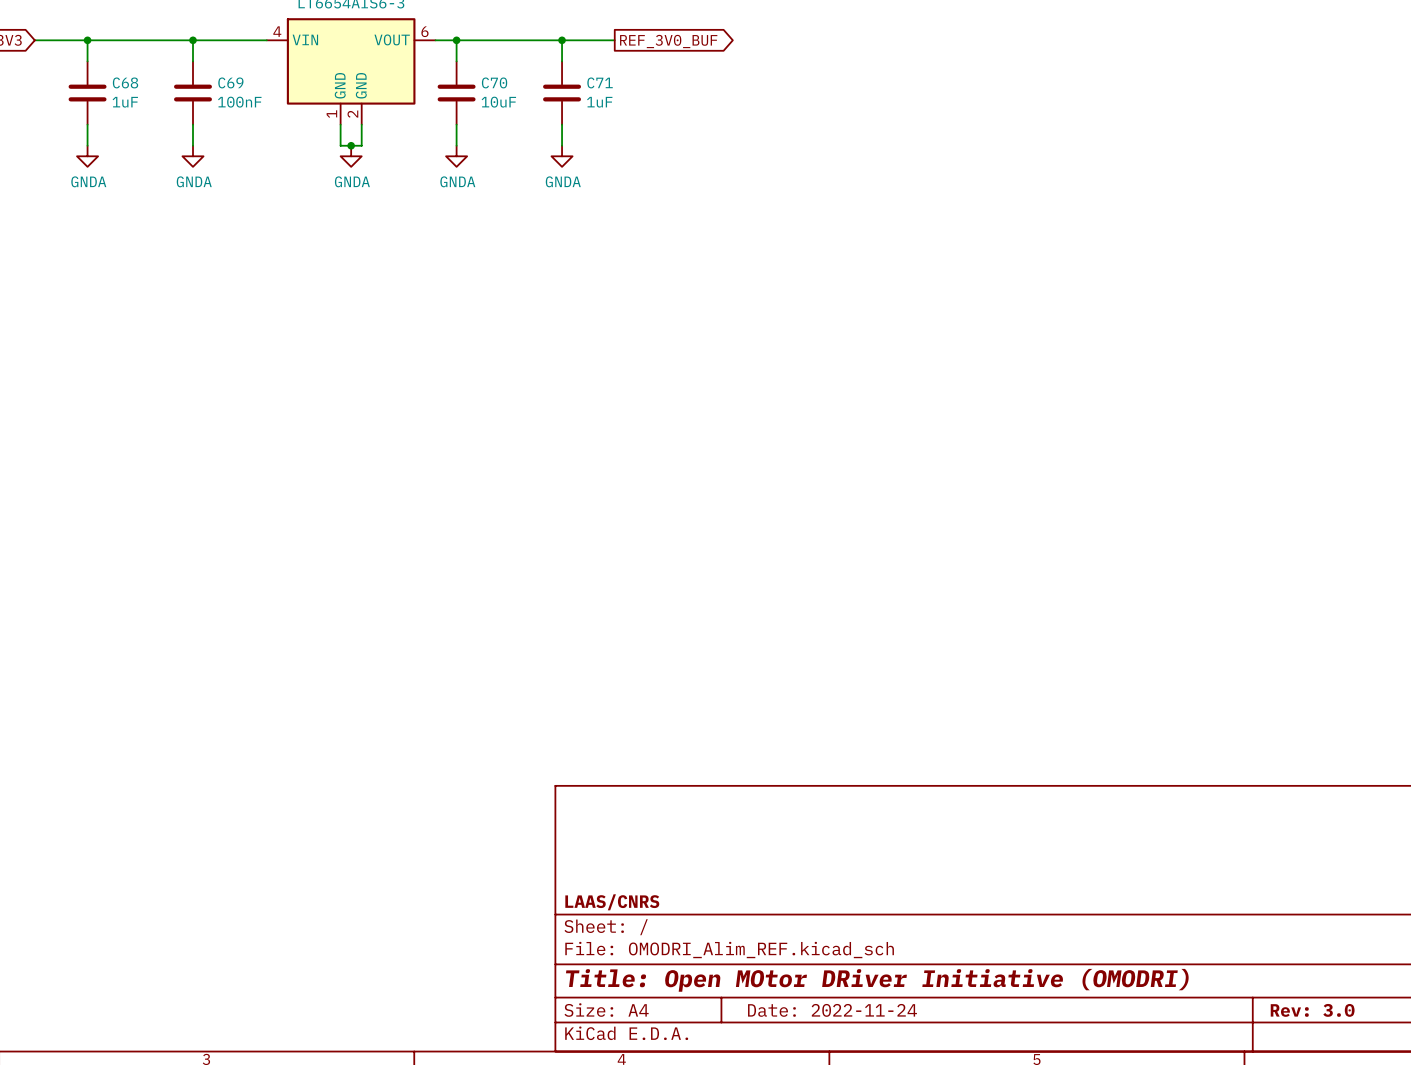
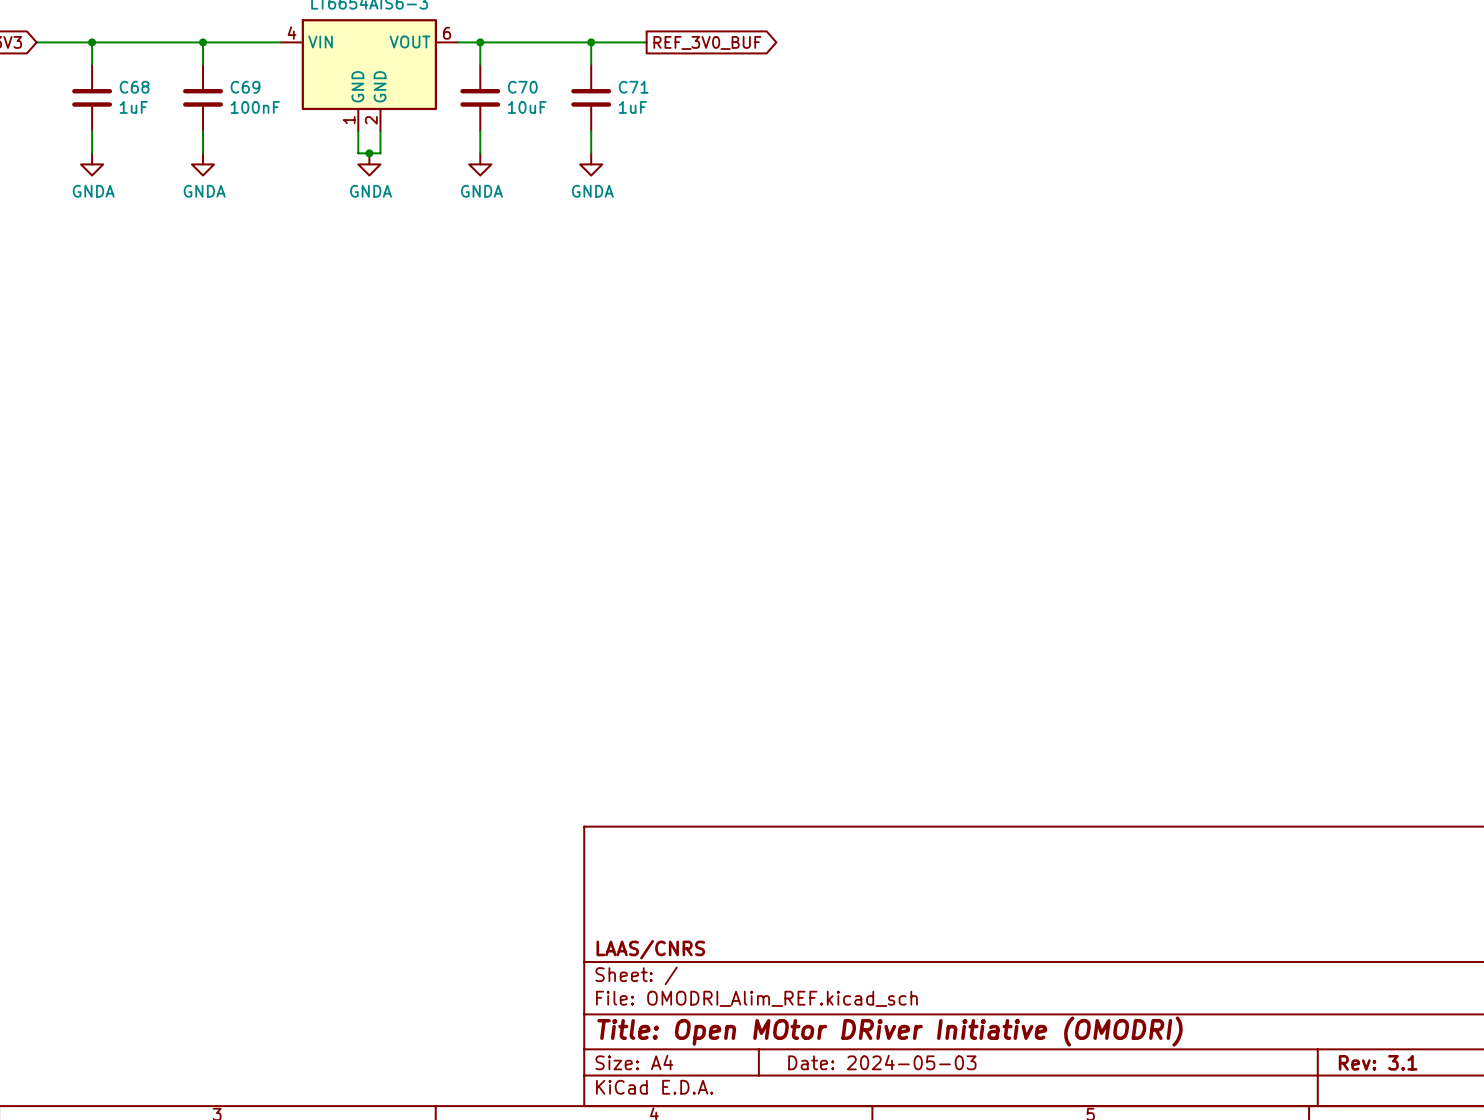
title block: Date: 2022-11-24 (832, 1010) -> Date: 2024-05-03 (882, 1062)
title block: Rev: 3.0 (1312, 1010) -> Rev: 3.1 (1378, 1062)

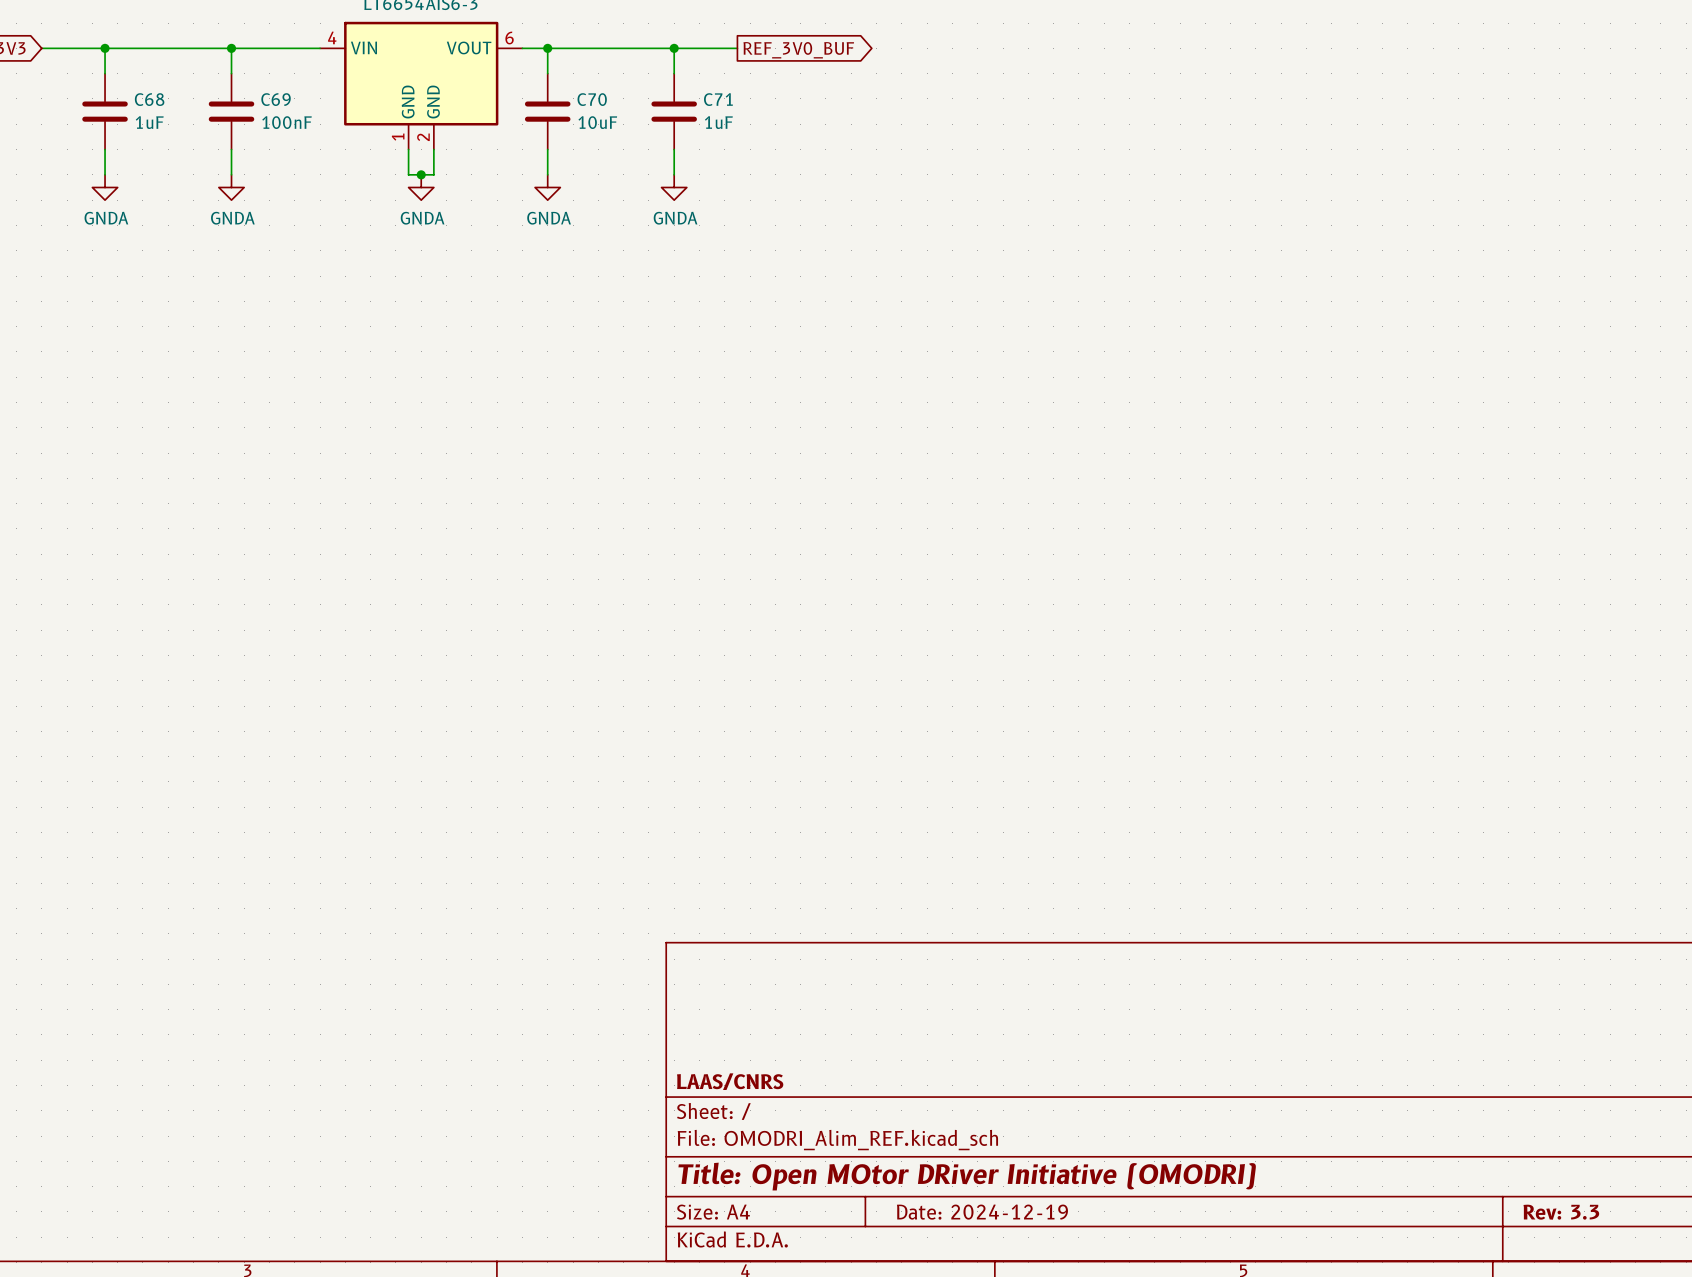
title block: Date: 2024-05-03 (882, 1062) -> Date: 2024-12-19 (982, 1212)
title block: Rev: 3.1 (1378, 1062) -> Rev: 3.3 (1561, 1212)

